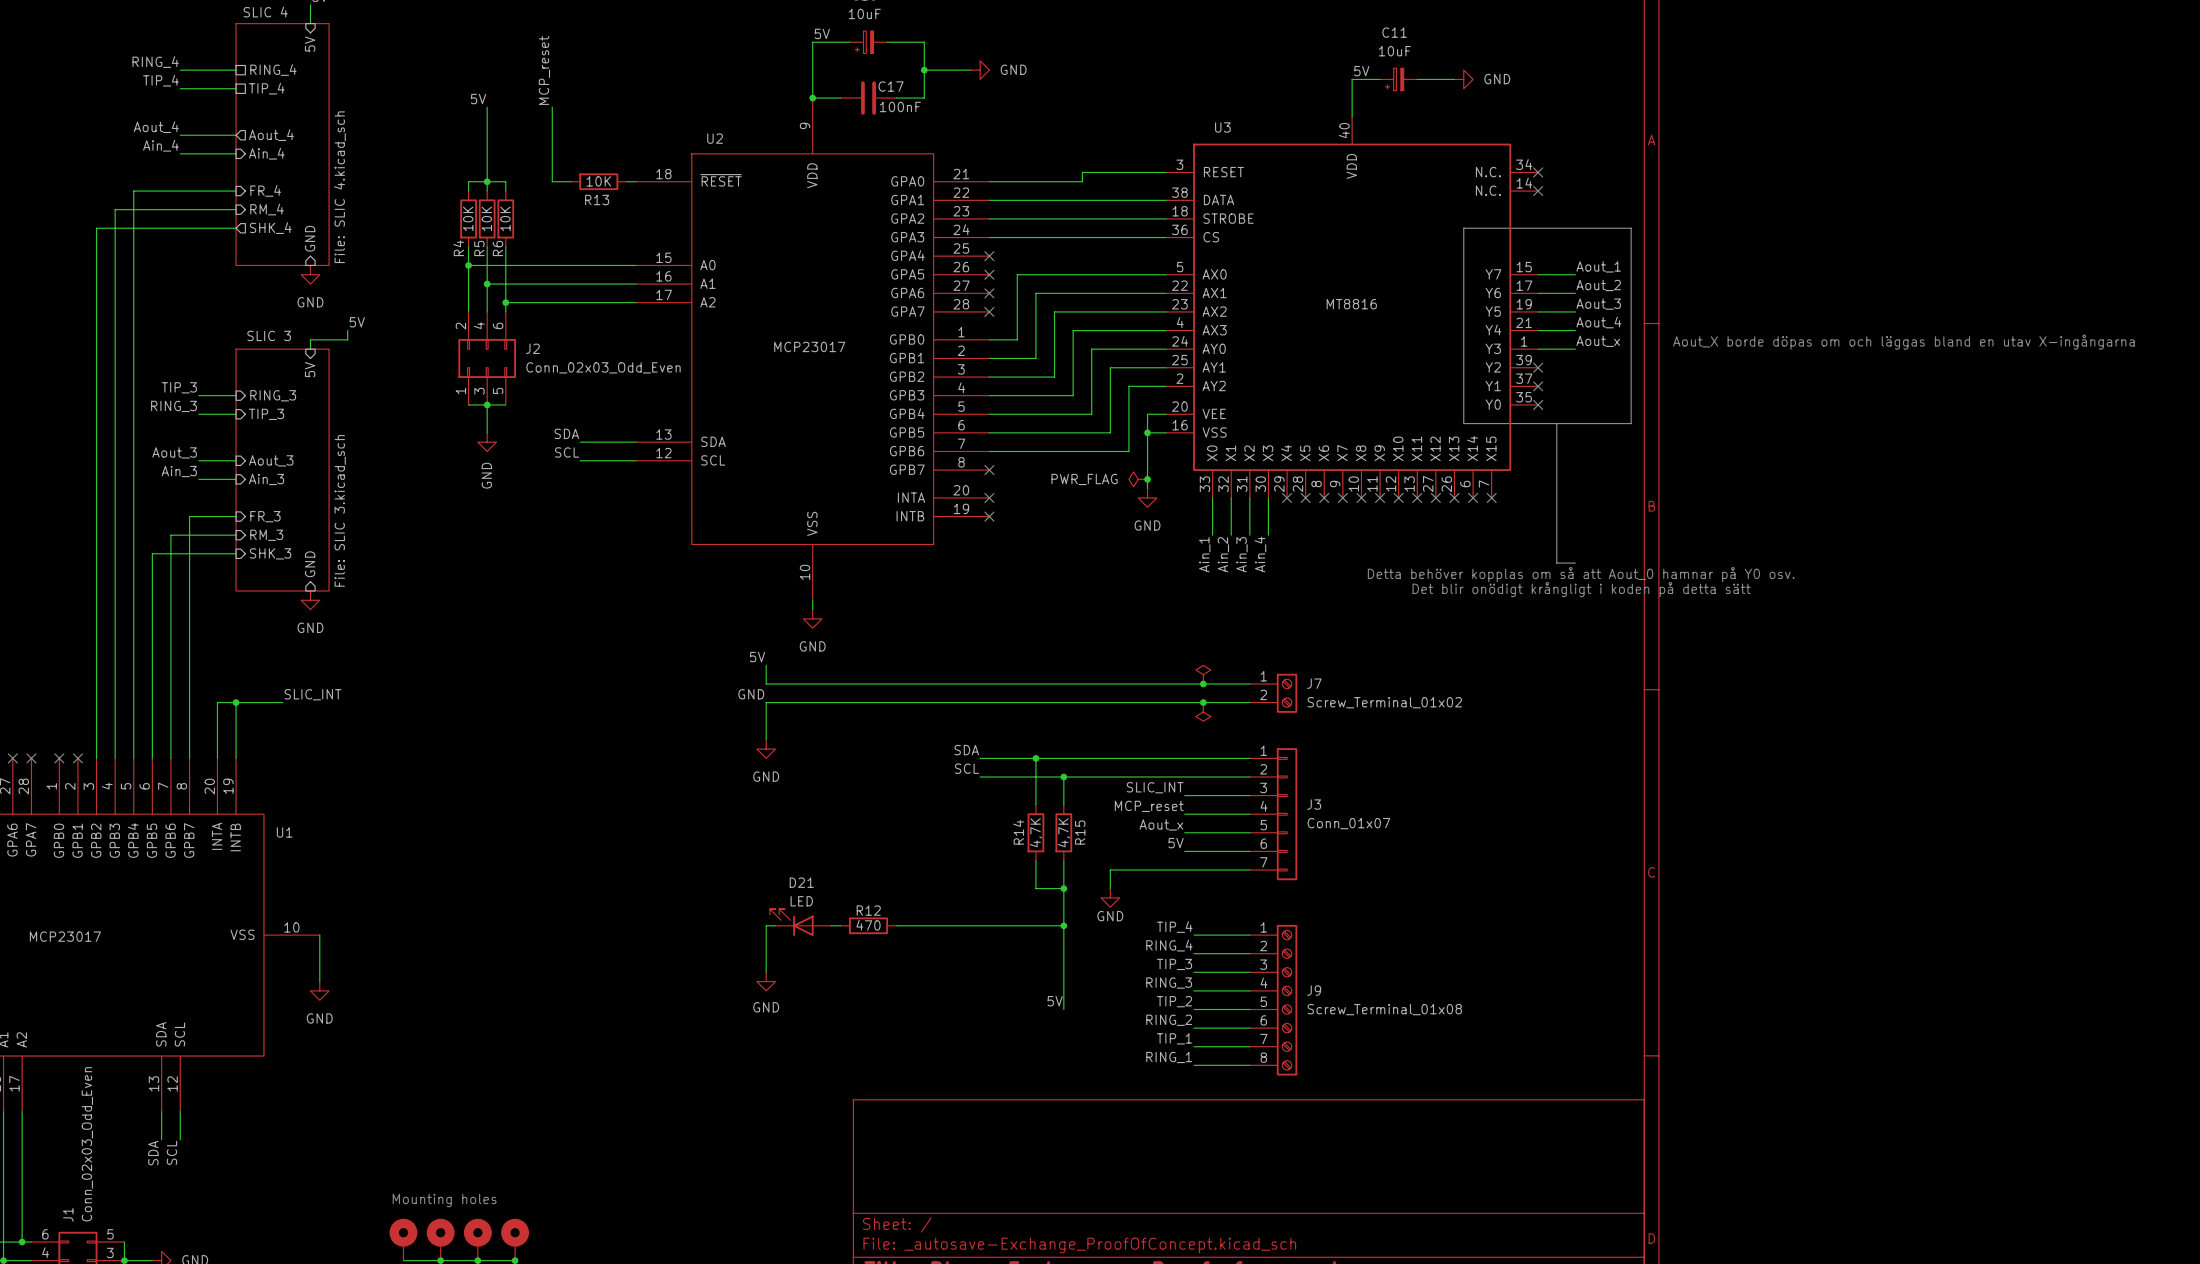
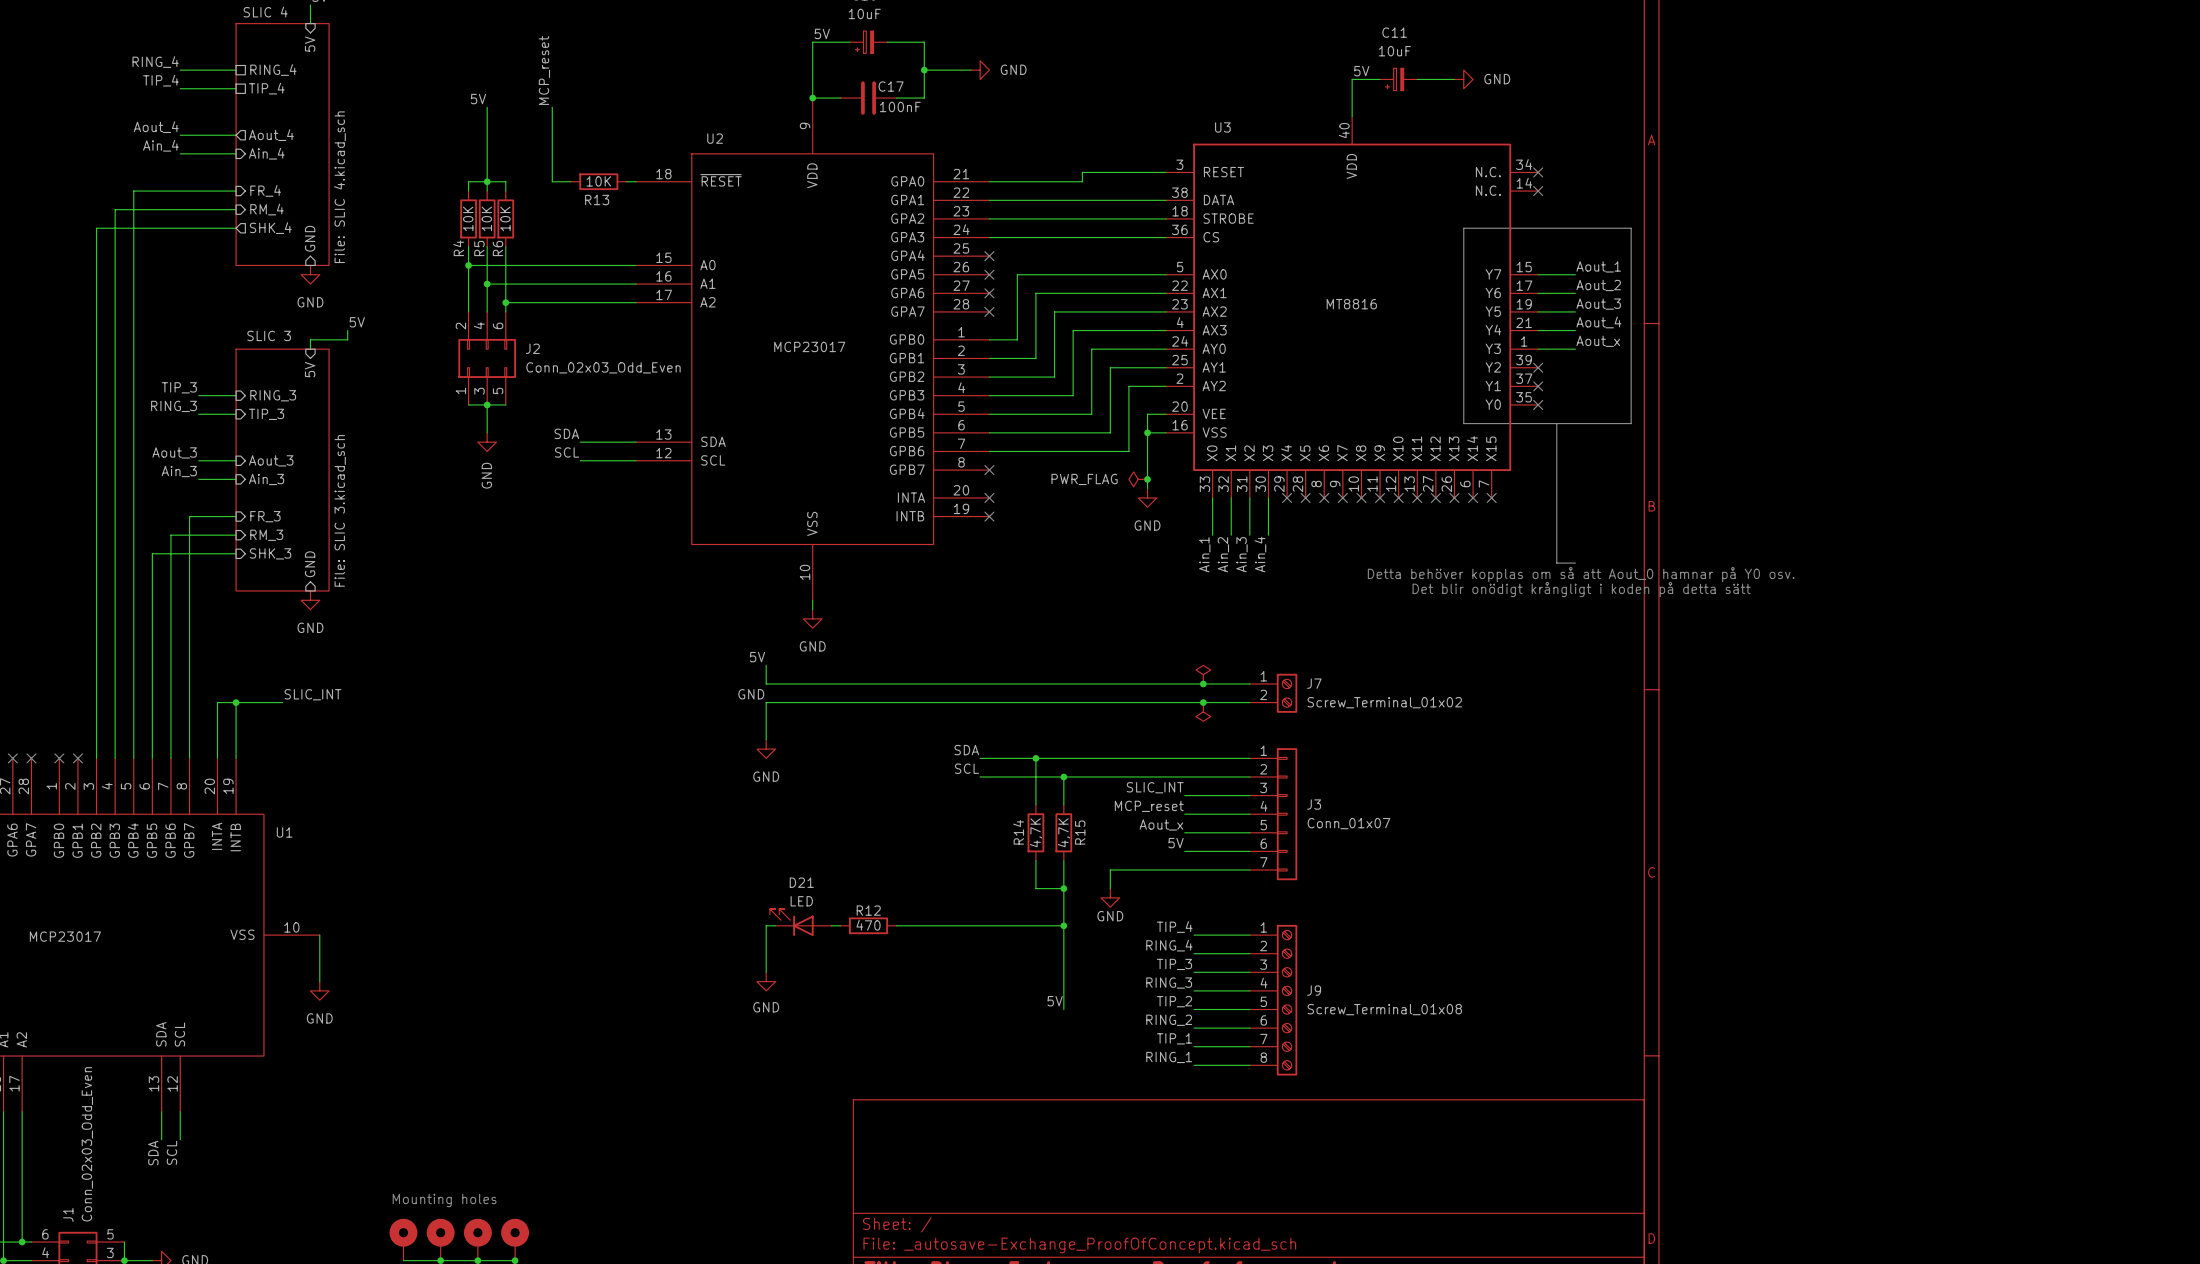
text: Aout_X borde döpas om och läggas bland en utav X-ingångarna (1903, 342) -> none

